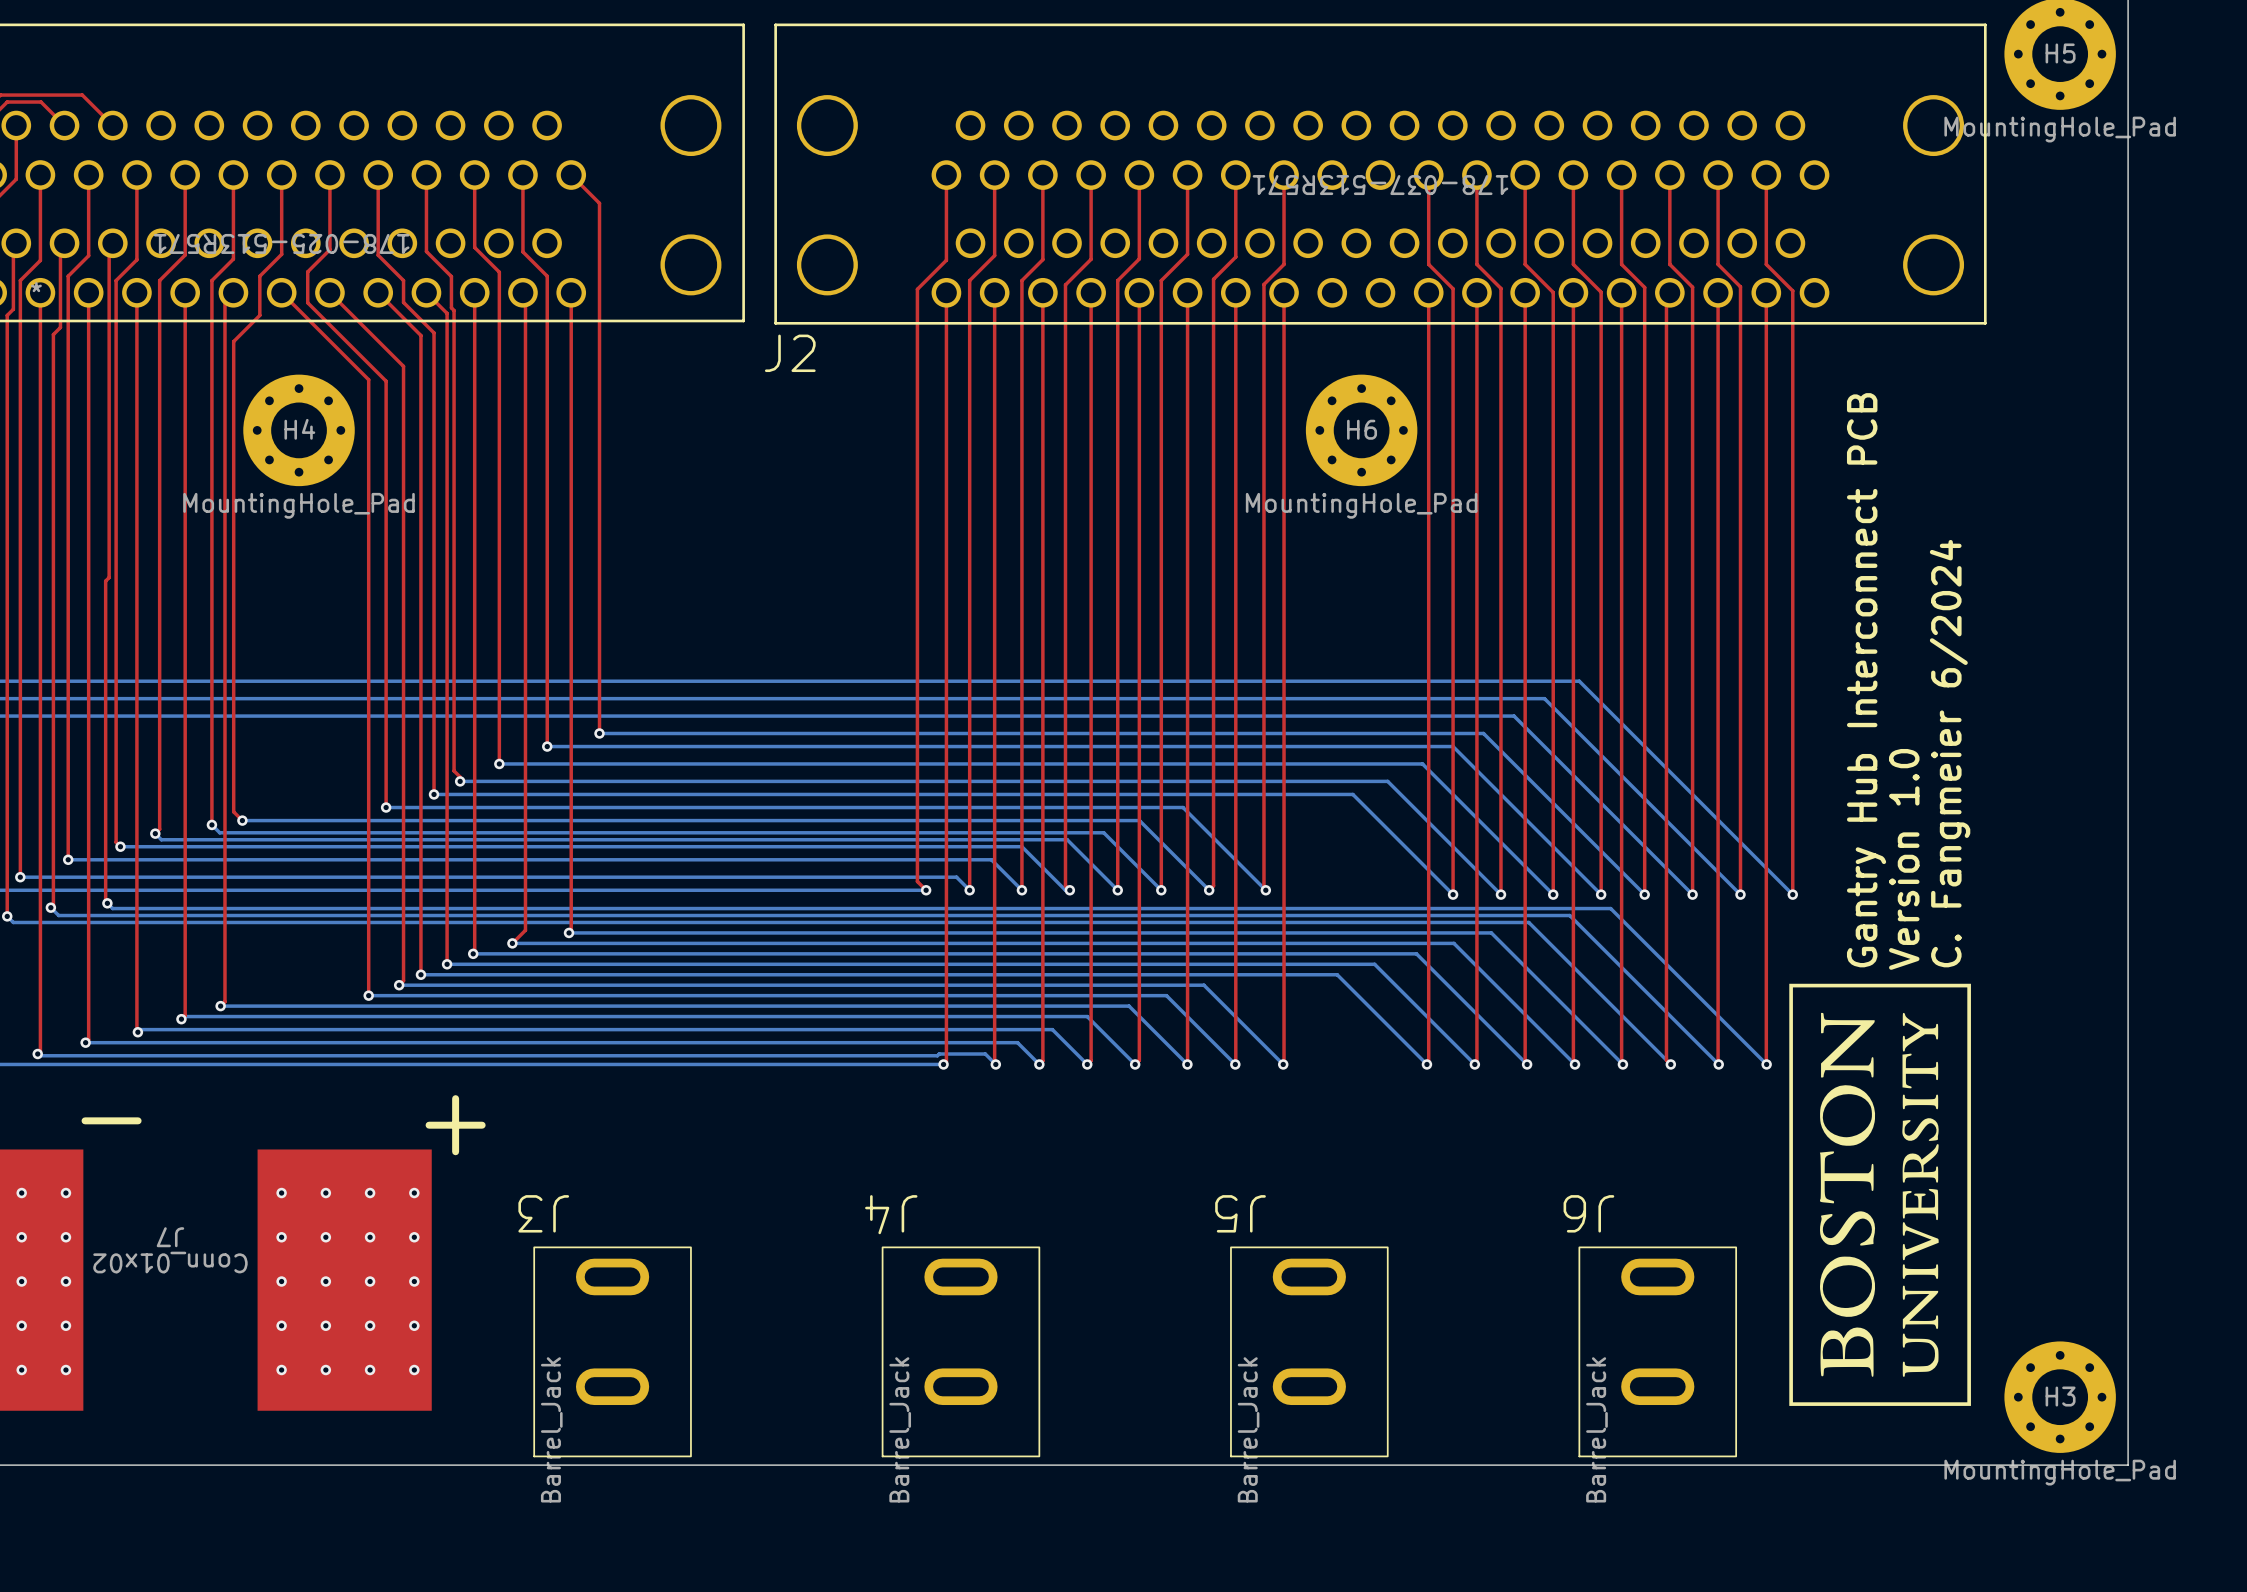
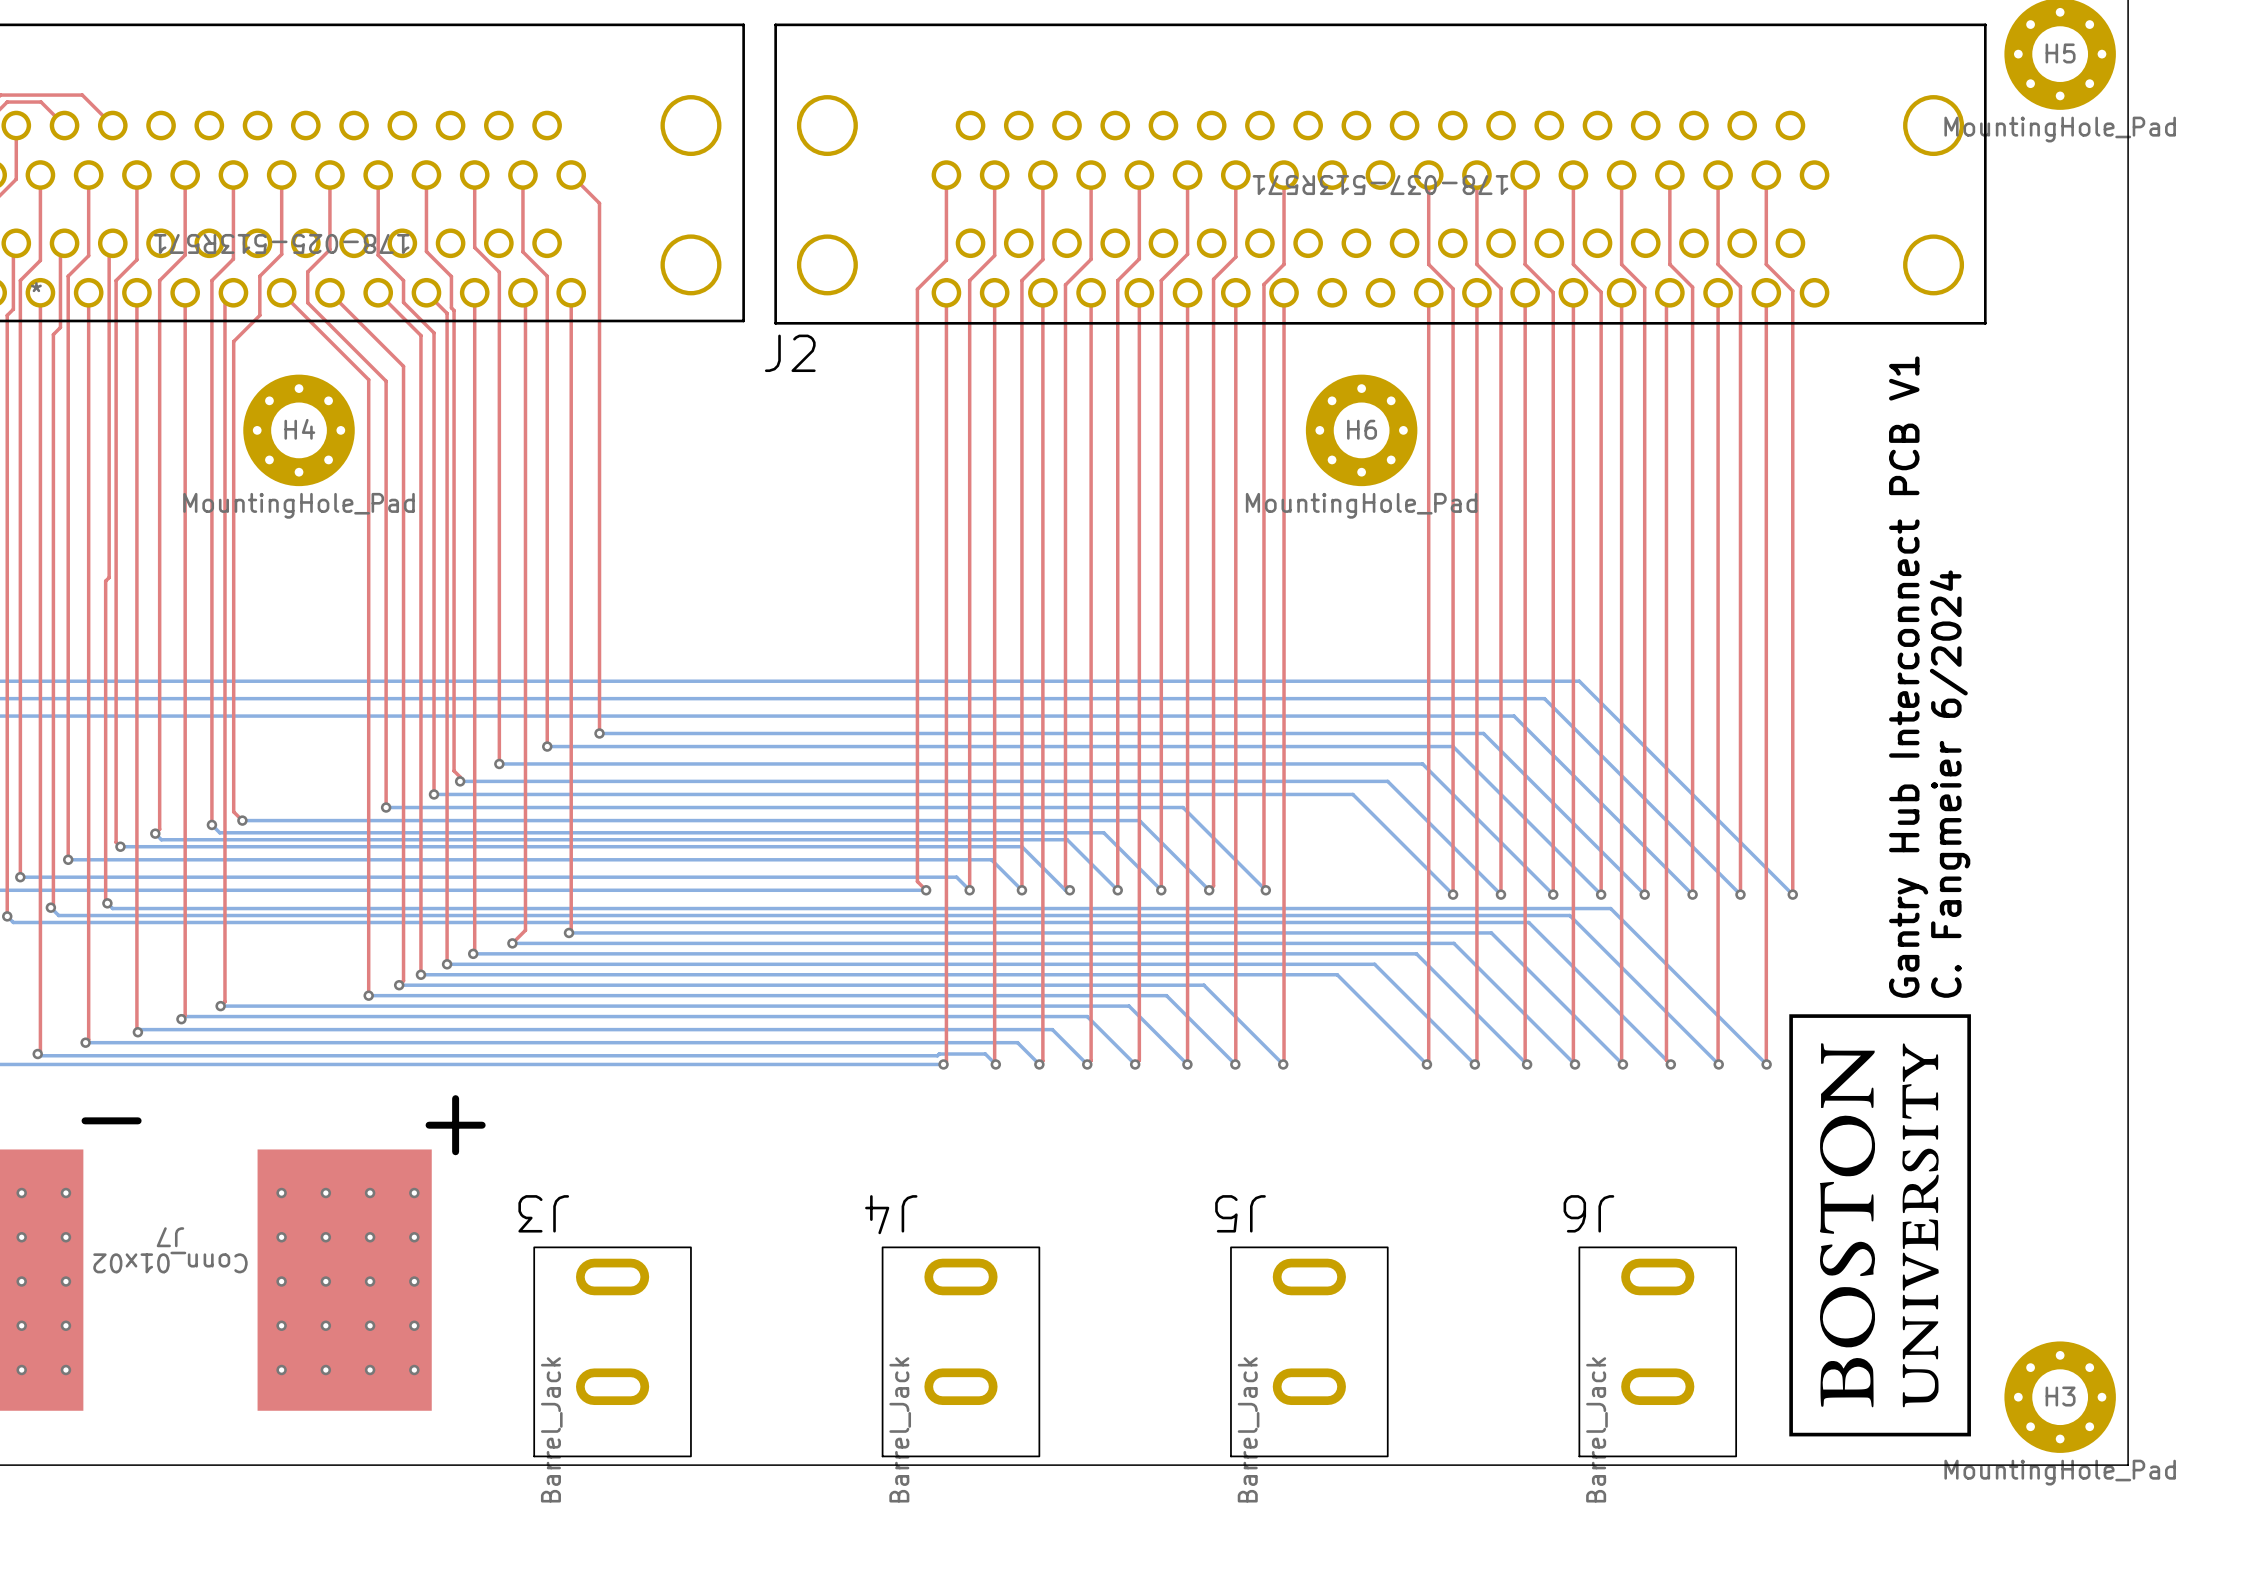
text: Gantry Hub Interconnect PCB (1866, 680) -> Gantry Hub Interconnect PCB V1 (1908, 677)
text position: C. Fangmeier 6/2024 (1950, 753) -> C. Fangmeier 6/2024 (1950, 784)
text: Version 1.0 (1904, 859) -> none
drawing position: (1880, 1194) -> (1880, 1225)

